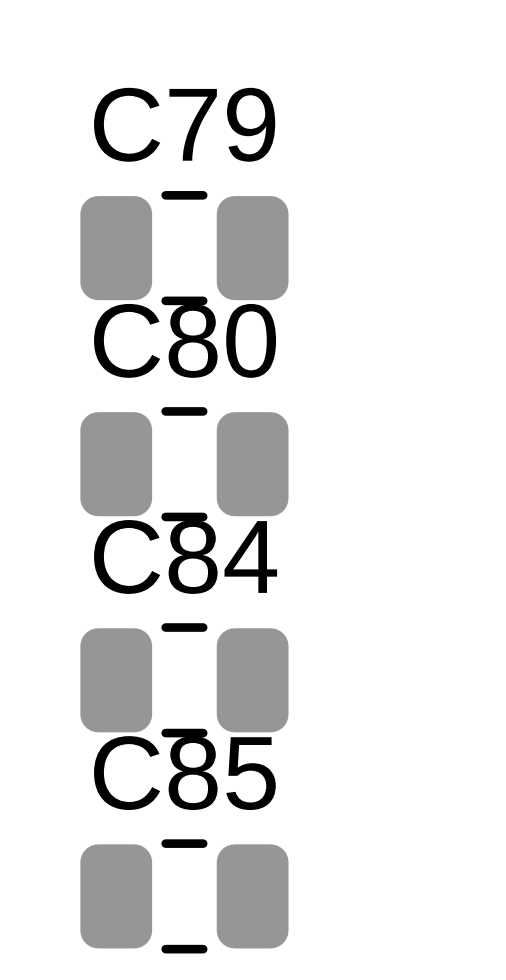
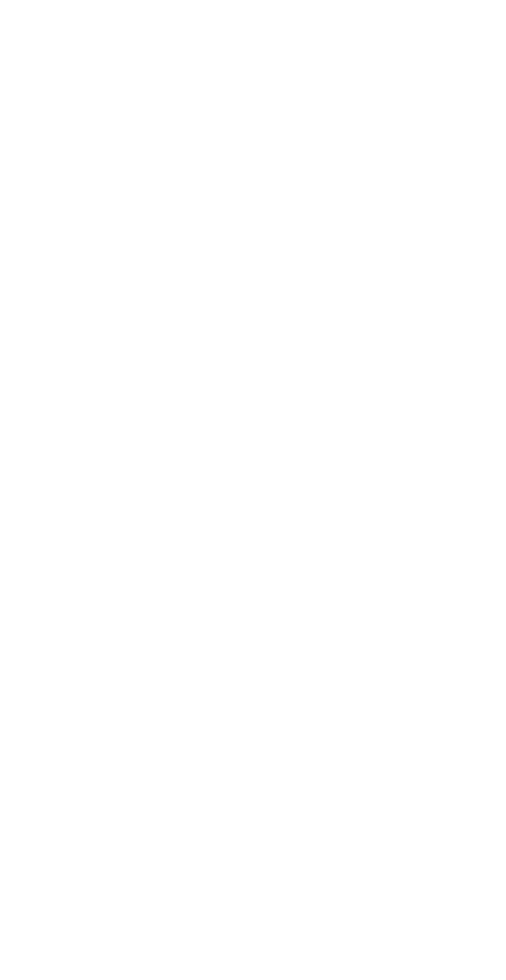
C79: (184, 248) -> none
C80: (184, 464) -> none
C84: (184, 680) -> none
C85: (184, 896) -> none

